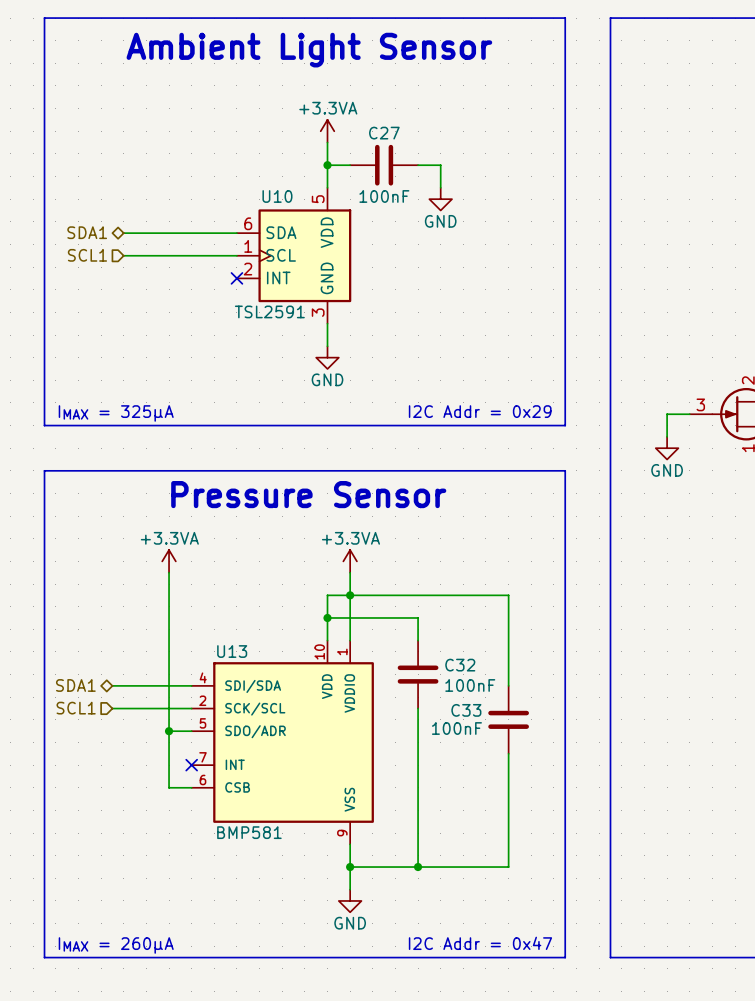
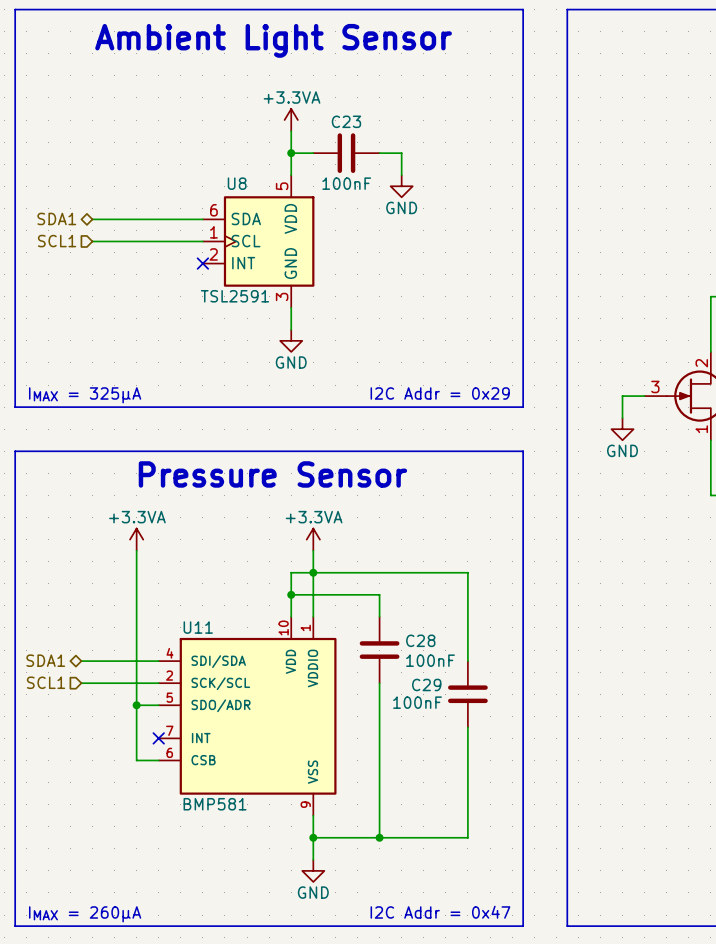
C27 name: C27 (384, 133) -> C23 (346, 121)
U10 name: U10 (277, 196) -> U8 (237, 183)
U13 name: U13 (232, 651) -> U11 (198, 627)
C32 name: C32 (460, 665) -> C28 (420, 640)
C33 name: C33 (466, 710) -> C29 (426, 684)

